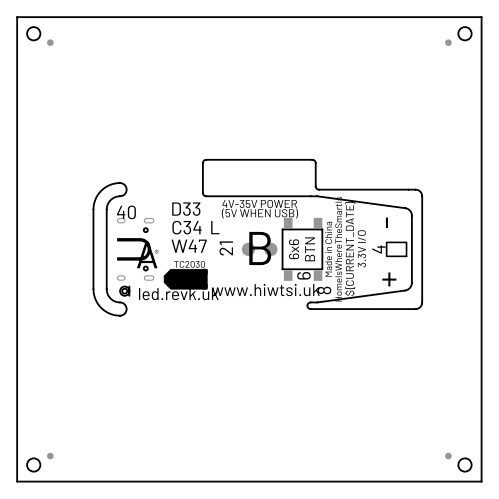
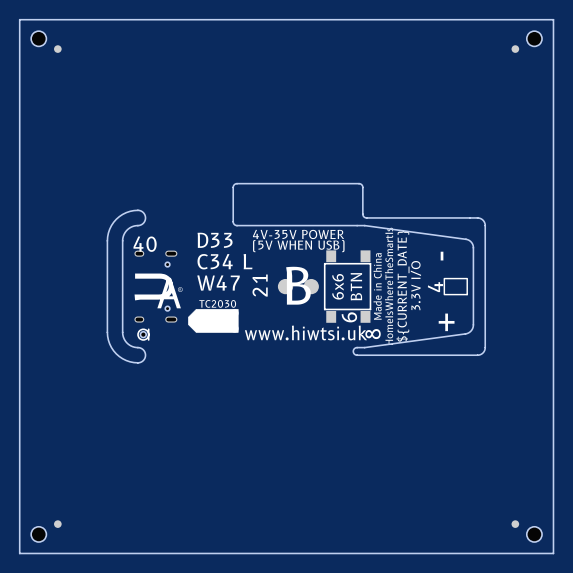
text: led.revk.uk (178, 294) -> none

